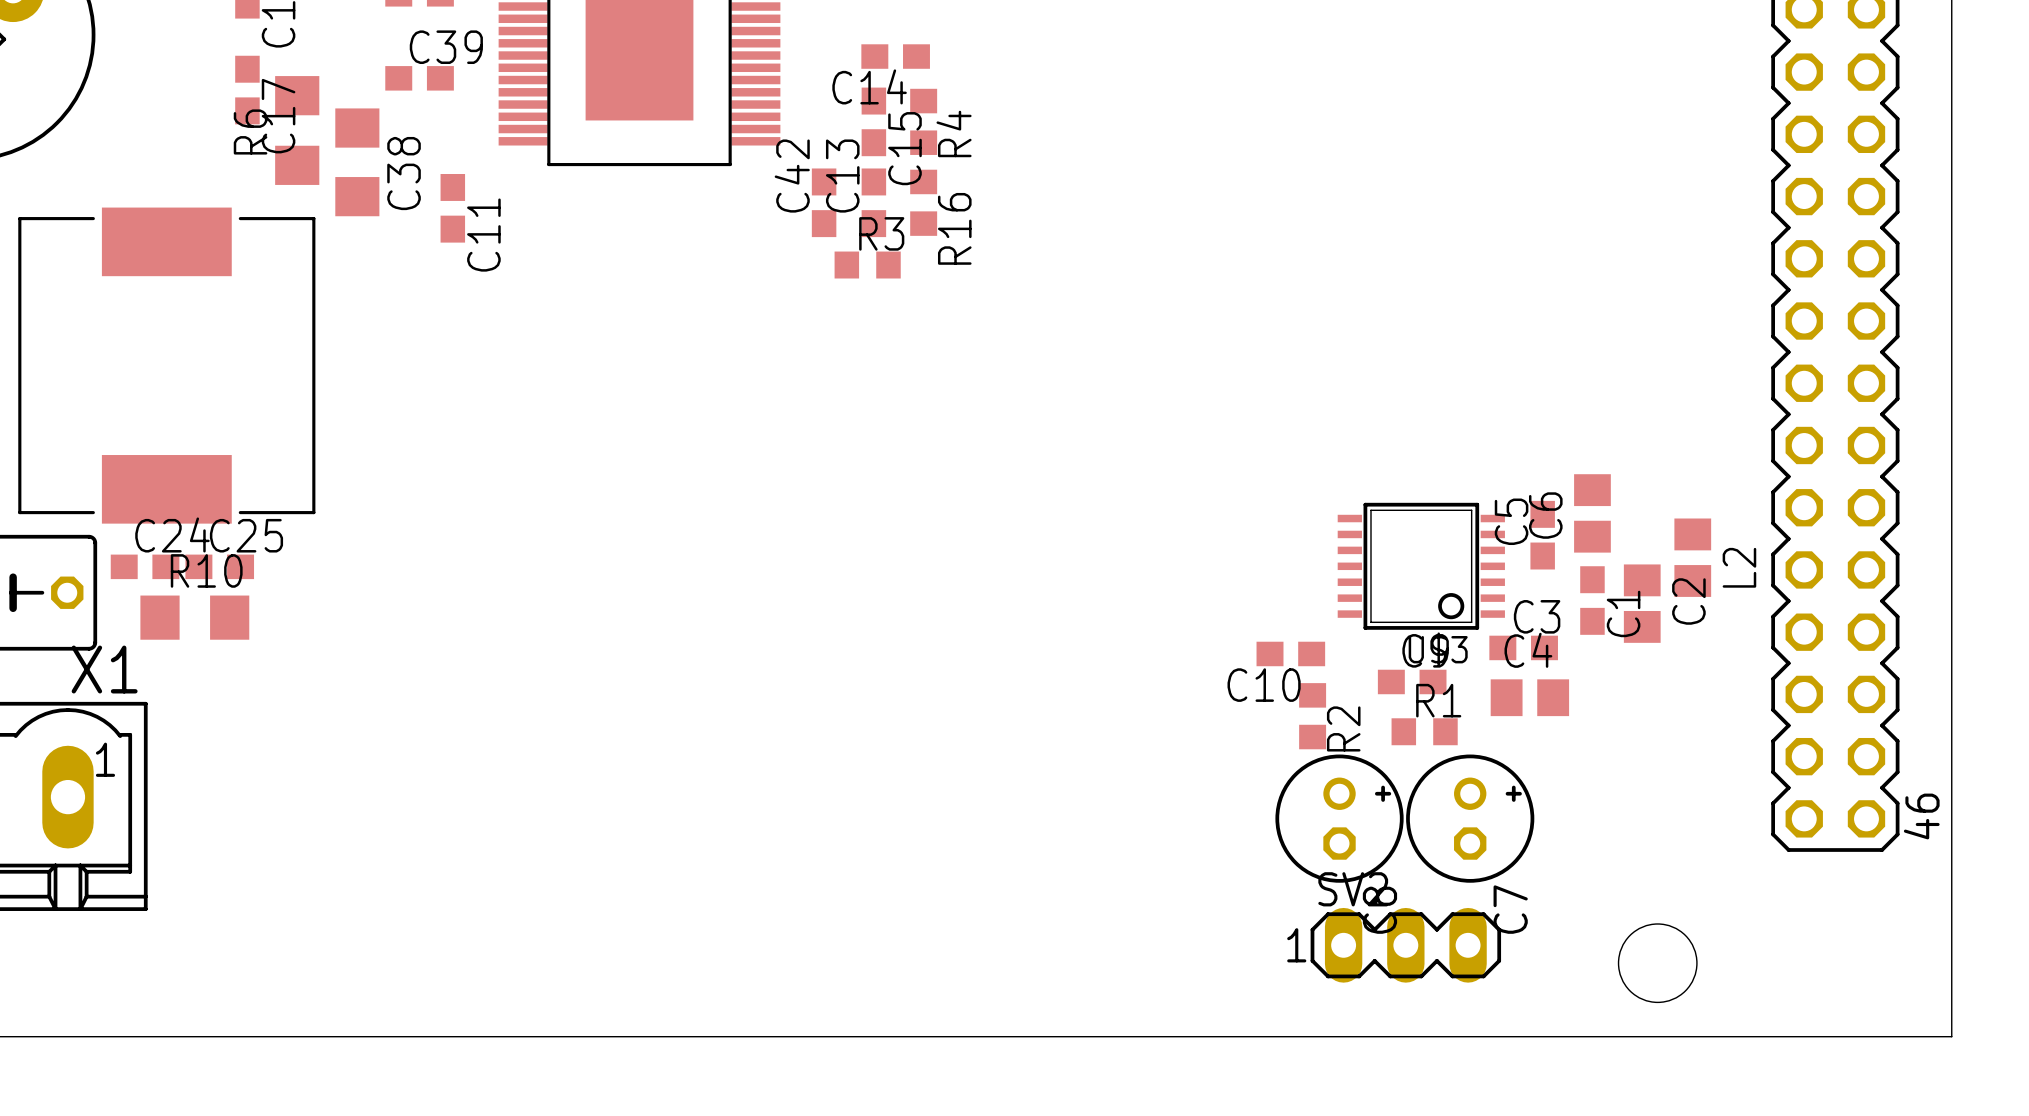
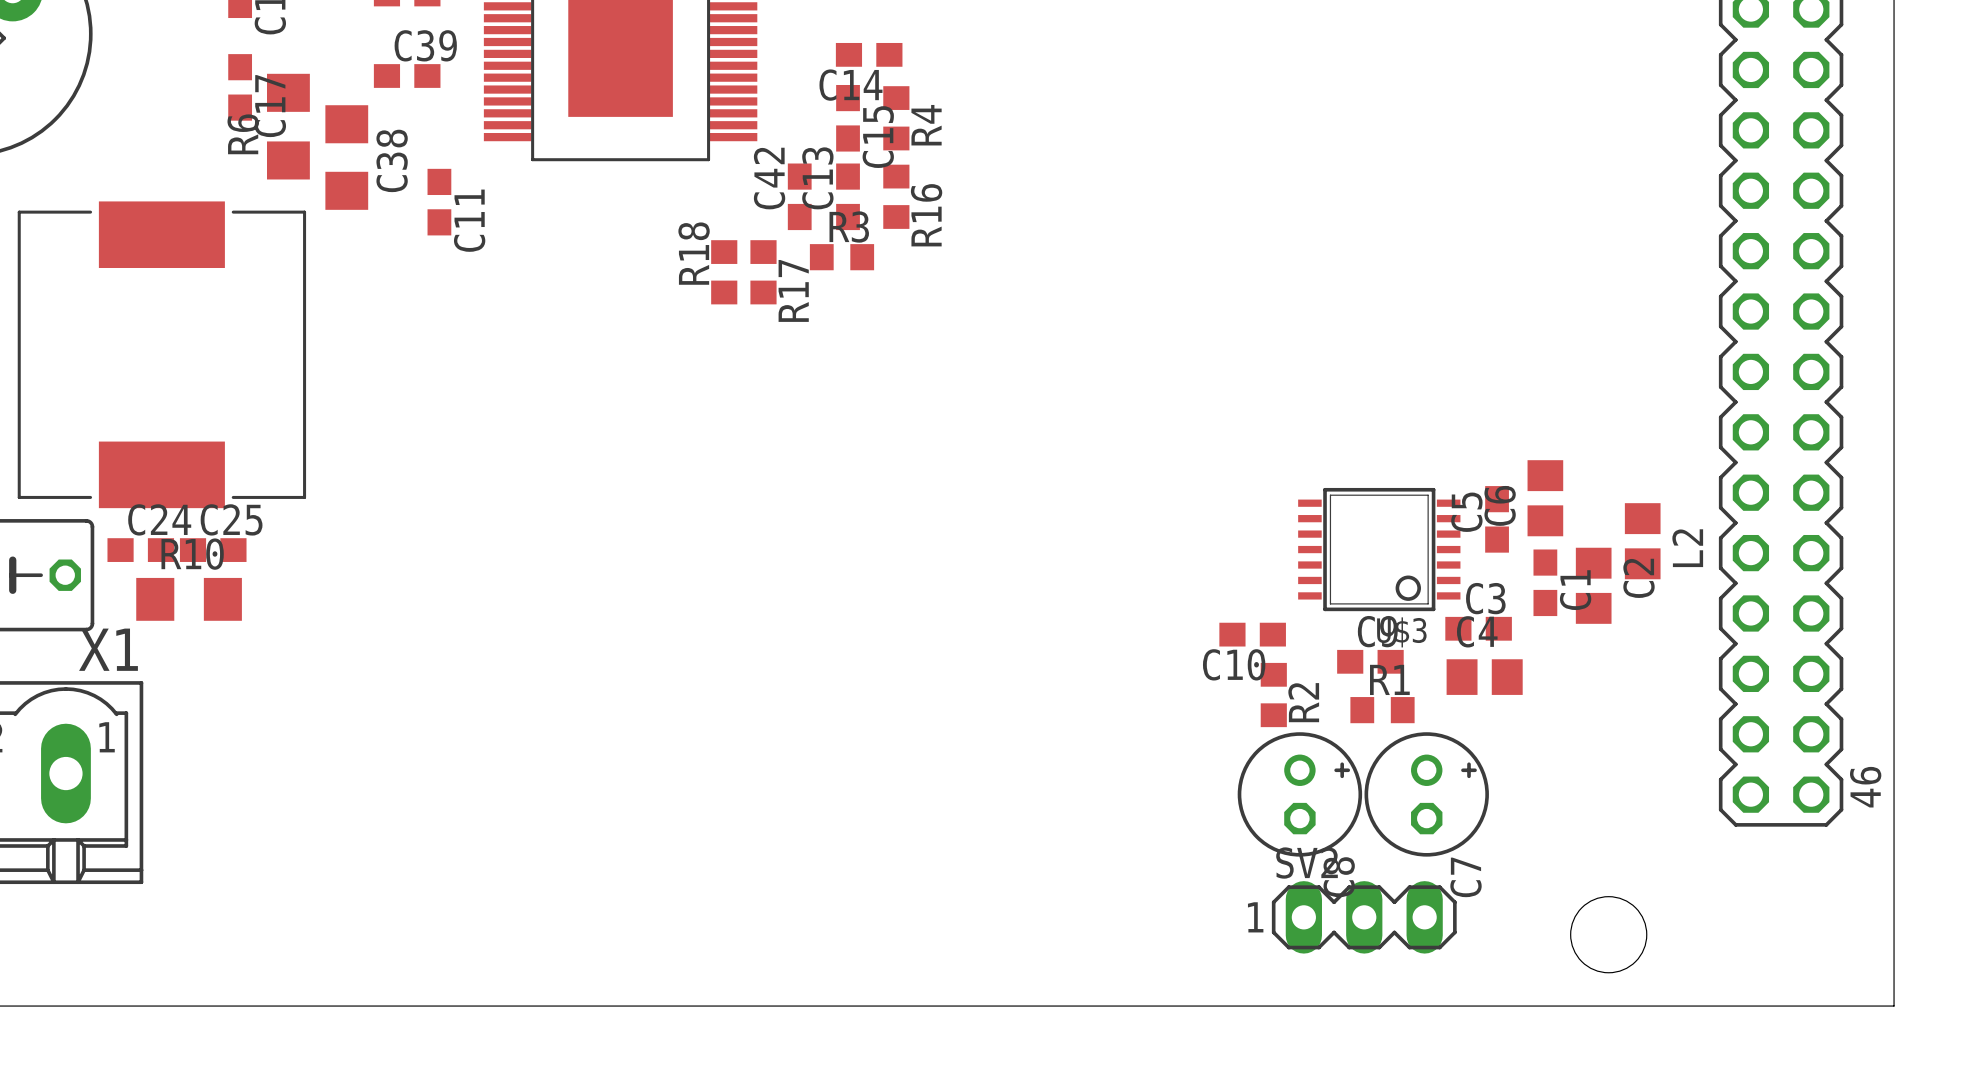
R18: none -> (724, 272)
R17: none -> (763, 272)

